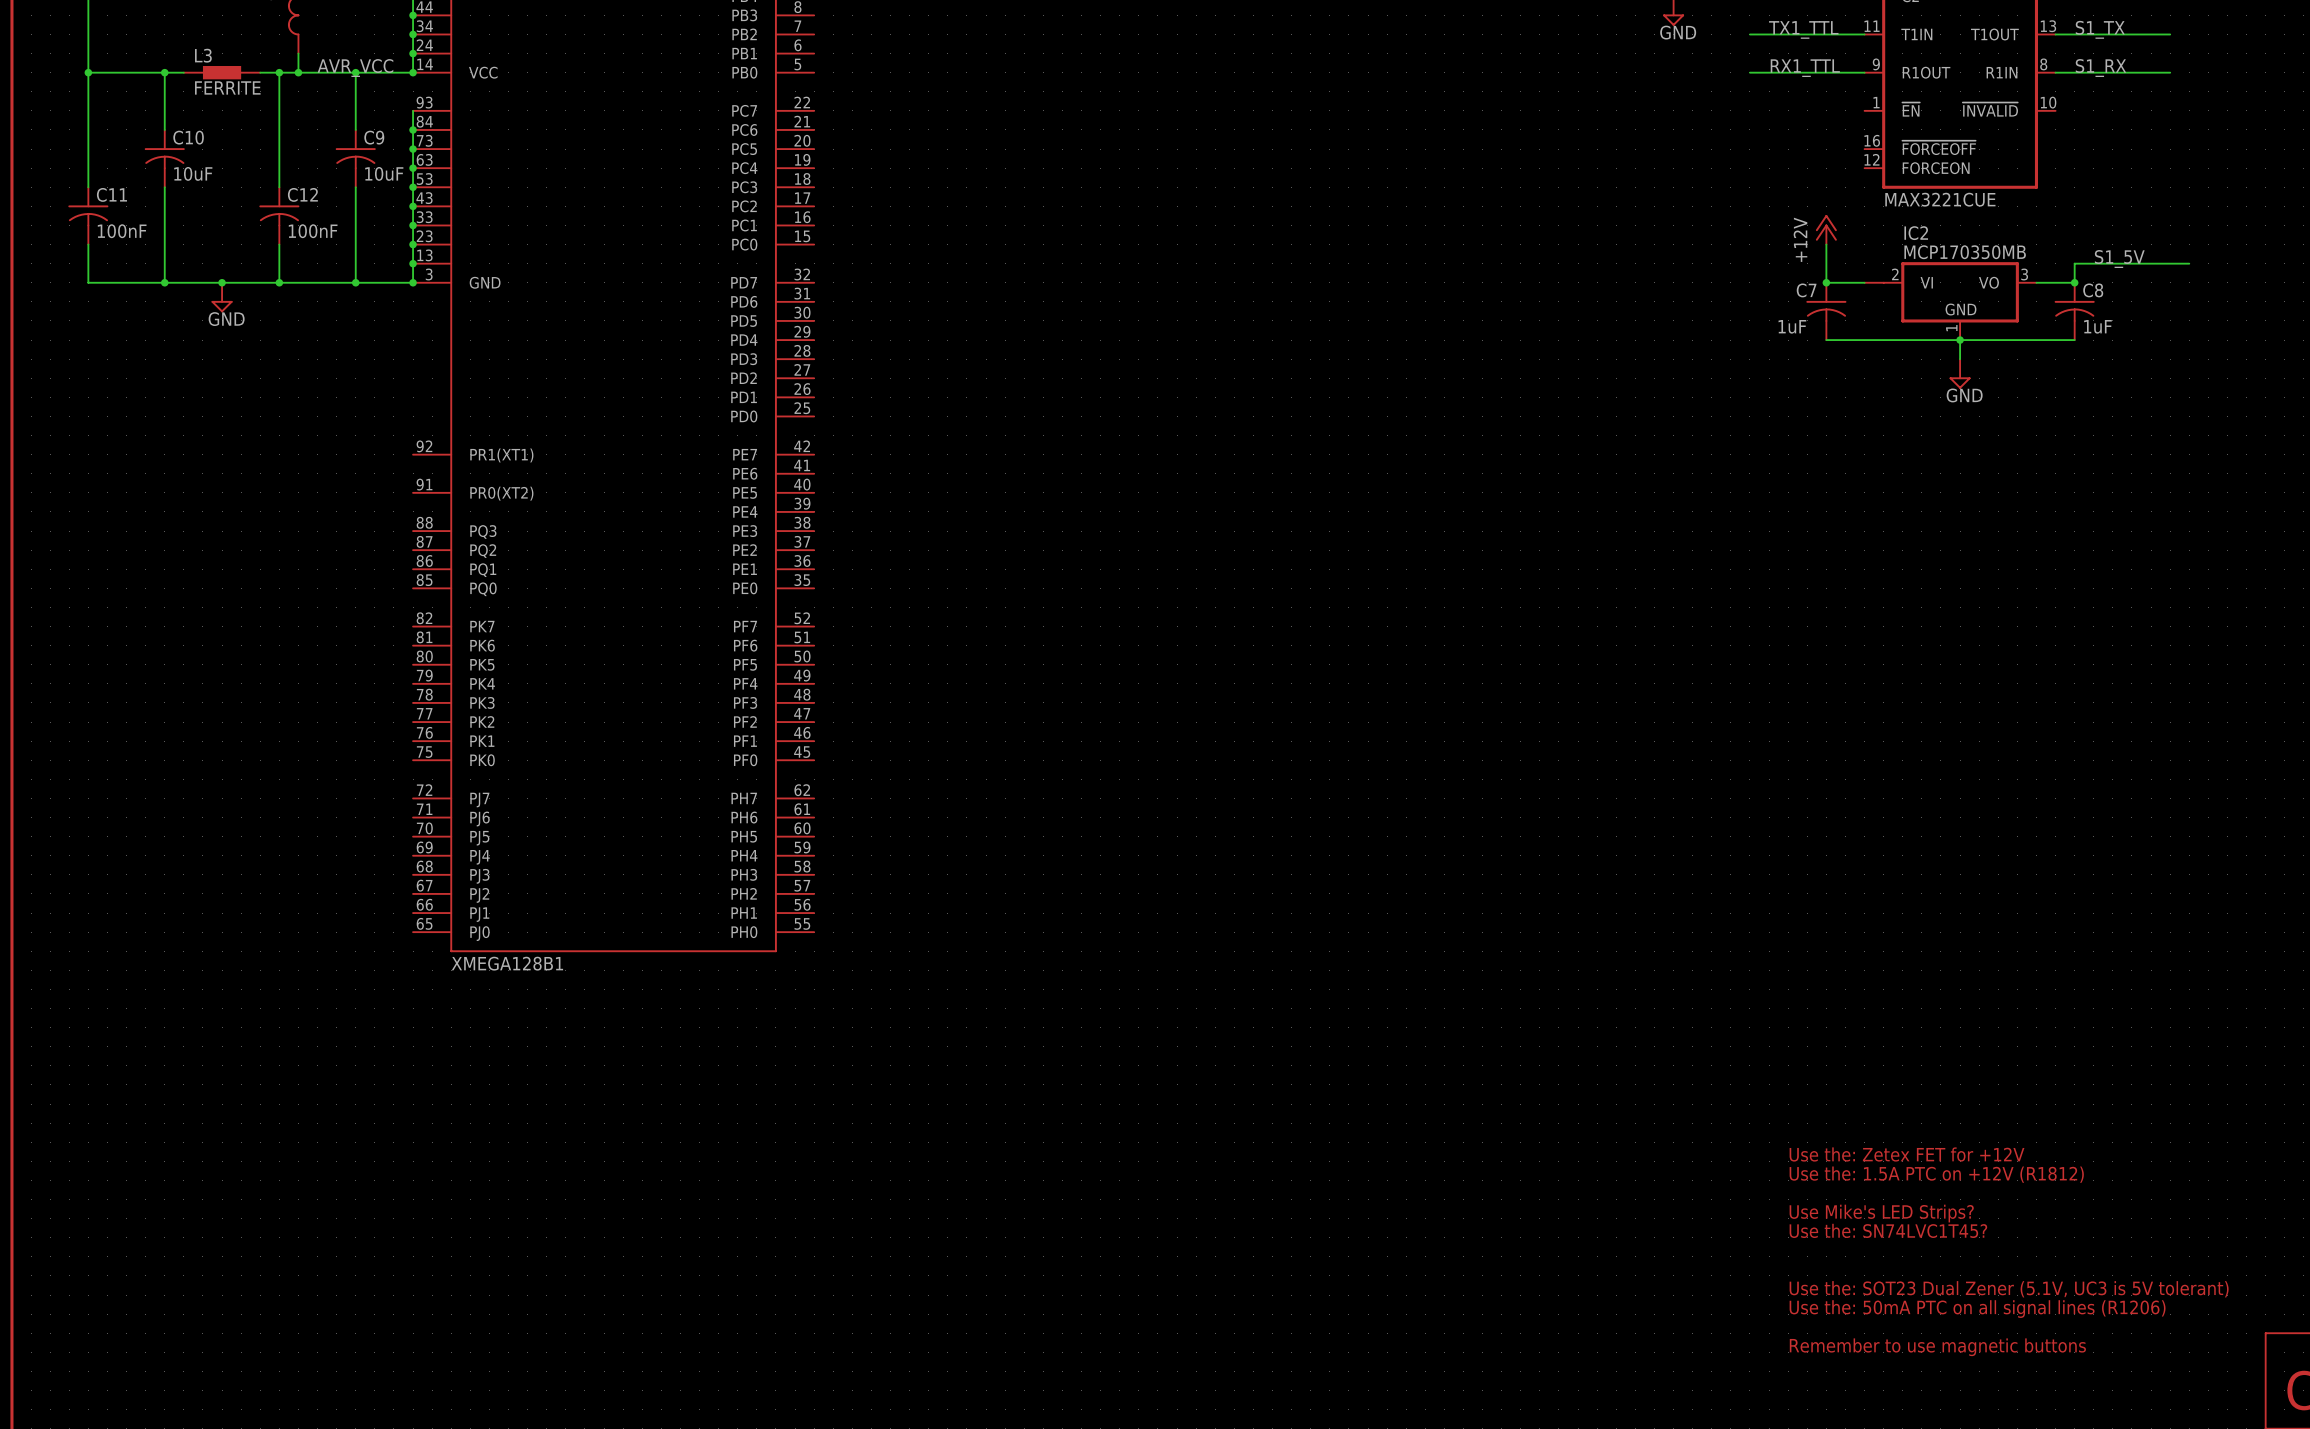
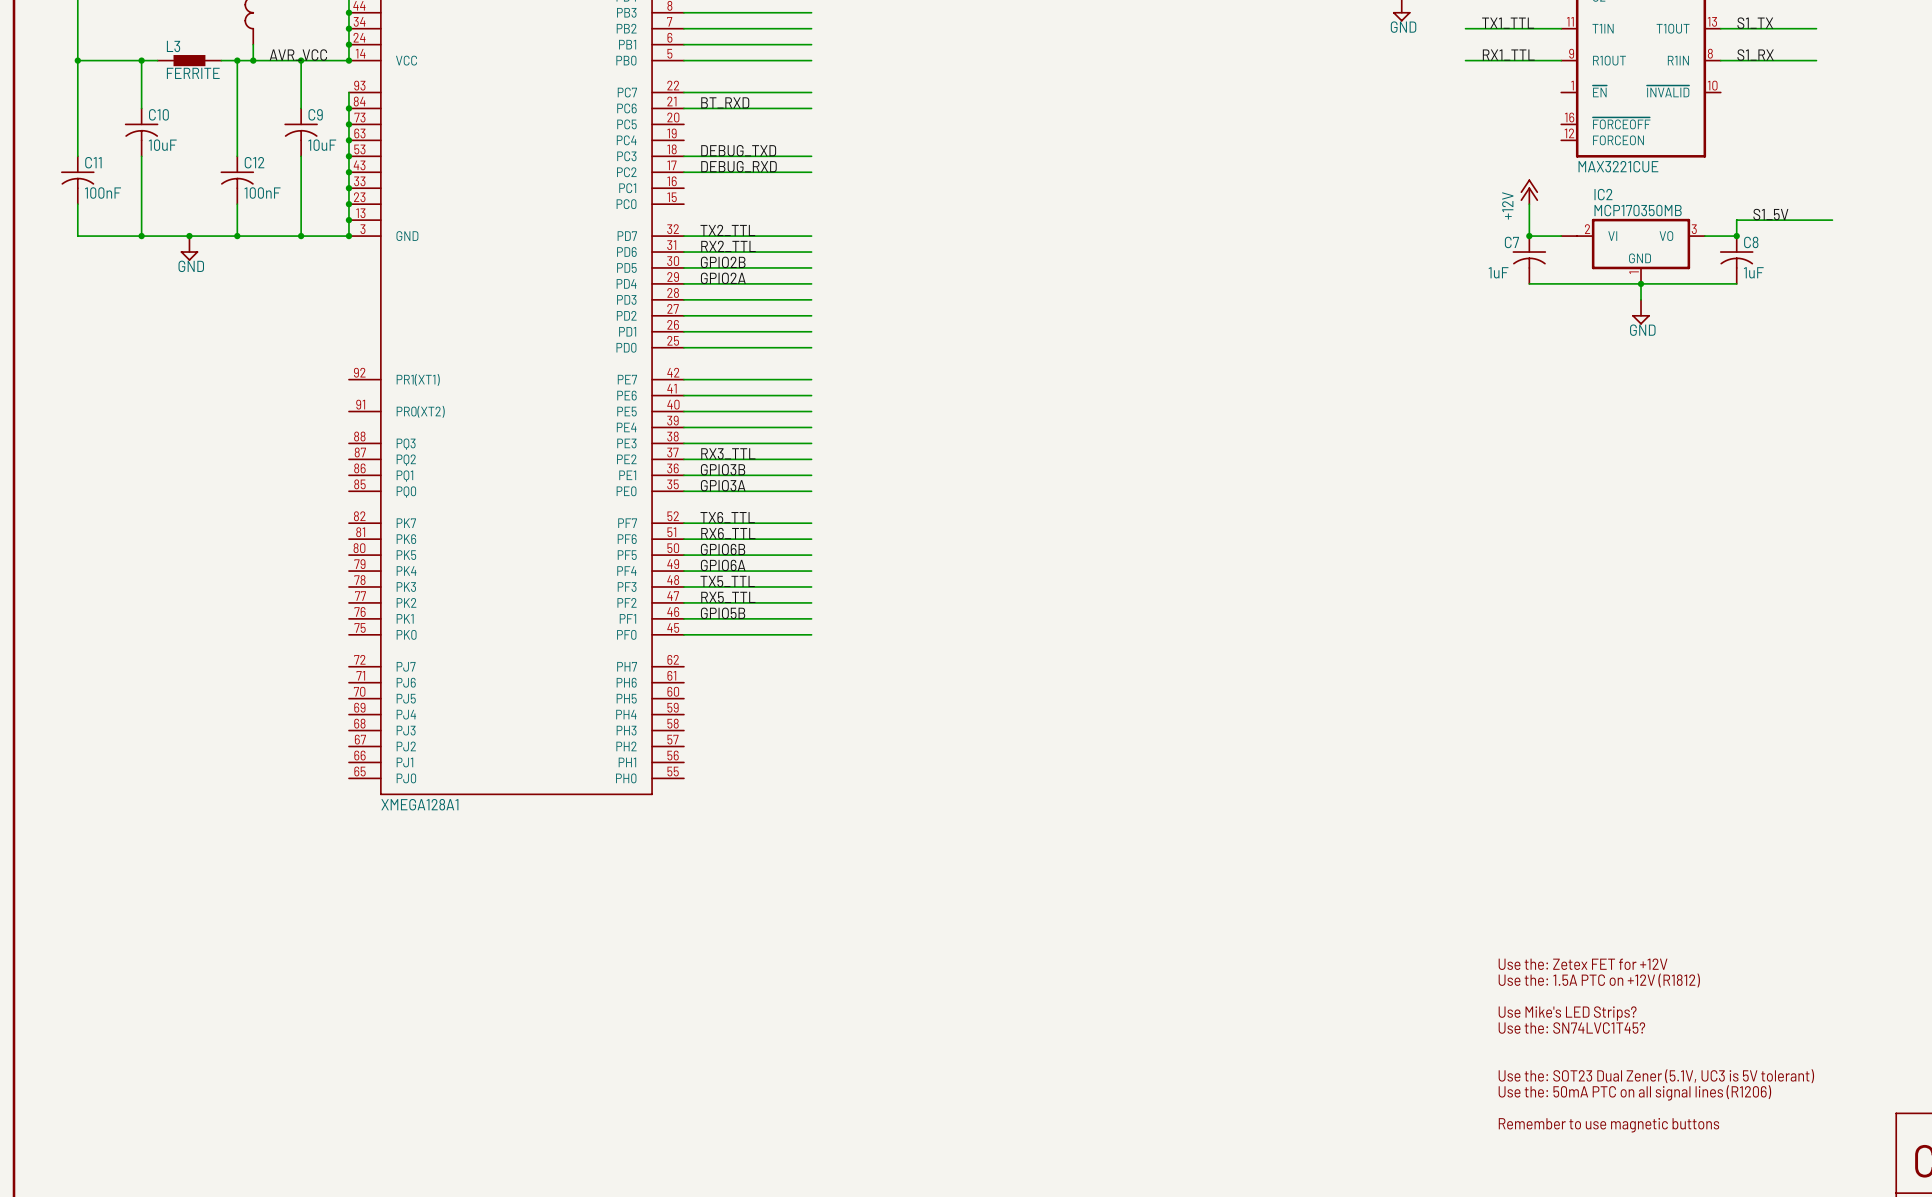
wire: none -> (683, 12) (811, 12)
wire: none -> (683, 28) (811, 28)
wire: none -> (683, 44) (811, 44)
wire: none -> (683, 60) (811, 60)
wire: none -> (683, 92) (811, 92)
label: none -> BT_RXD (725, 102)
wire: none -> (683, 108) (811, 108)
label: none -> DEBUG_TXD (738, 150)
wire: none -> (683, 156) (811, 156)
label: none -> DEBUG_RXD (738, 166)
wire: none -> (683, 172) (811, 172)
label: none -> TX2_TTL (727, 230)
wire: none -> (683, 236) (811, 236)
label: none -> RX2_TTL (728, 246)
wire: none -> (683, 252) (811, 252)
label: none -> GPIO2B (723, 262)
wire: none -> (683, 267) (811, 267)
label: none -> GPIO2A (723, 278)
wire: none -> (683, 283) (811, 283)
wire: none -> (683, 299) (811, 299)
wire: none -> (683, 315) (811, 315)
wire: none -> (683, 331) (811, 331)
wire: none -> (683, 347) (811, 347)
wire: none -> (683, 379) (811, 379)
wire: none -> (683, 395) (811, 395)
wire: none -> (683, 411) (811, 411)
wire: none -> (683, 427) (811, 427)
wire: none -> (683, 443) (811, 443)
label: none -> RX3_TTL (728, 453)
wire: none -> (683, 459) (811, 459)
label: none -> GPIO3B (723, 469)
wire: none -> (683, 475) (811, 475)
label: none -> GPIO3A (723, 485)
wire: none -> (683, 491) (811, 491)
label: none -> TX6_TTL (727, 517)
wire: none -> (683, 523) (811, 523)
label: none -> RX6_TTL (728, 533)
wire: none -> (683, 539) (811, 539)
label: none -> GPIO6B (723, 549)
wire: none -> (683, 555) (811, 555)
label: none -> GPIO6A (723, 565)
wire: none -> (683, 571) (811, 571)
label: none -> TX5_TTL (727, 581)
wire: none -> (683, 586) (811, 586)
label: none -> RX5_TTL (728, 597)
wire: none -> (683, 602) (811, 602)
label: none -> GPIO5B (723, 613)
wire: none -> (683, 618) (811, 618)
wire: none -> (683, 634) (811, 634)
part value: XMEGA128B1 (507, 963) -> XMEGA128A1 (419, 804)

